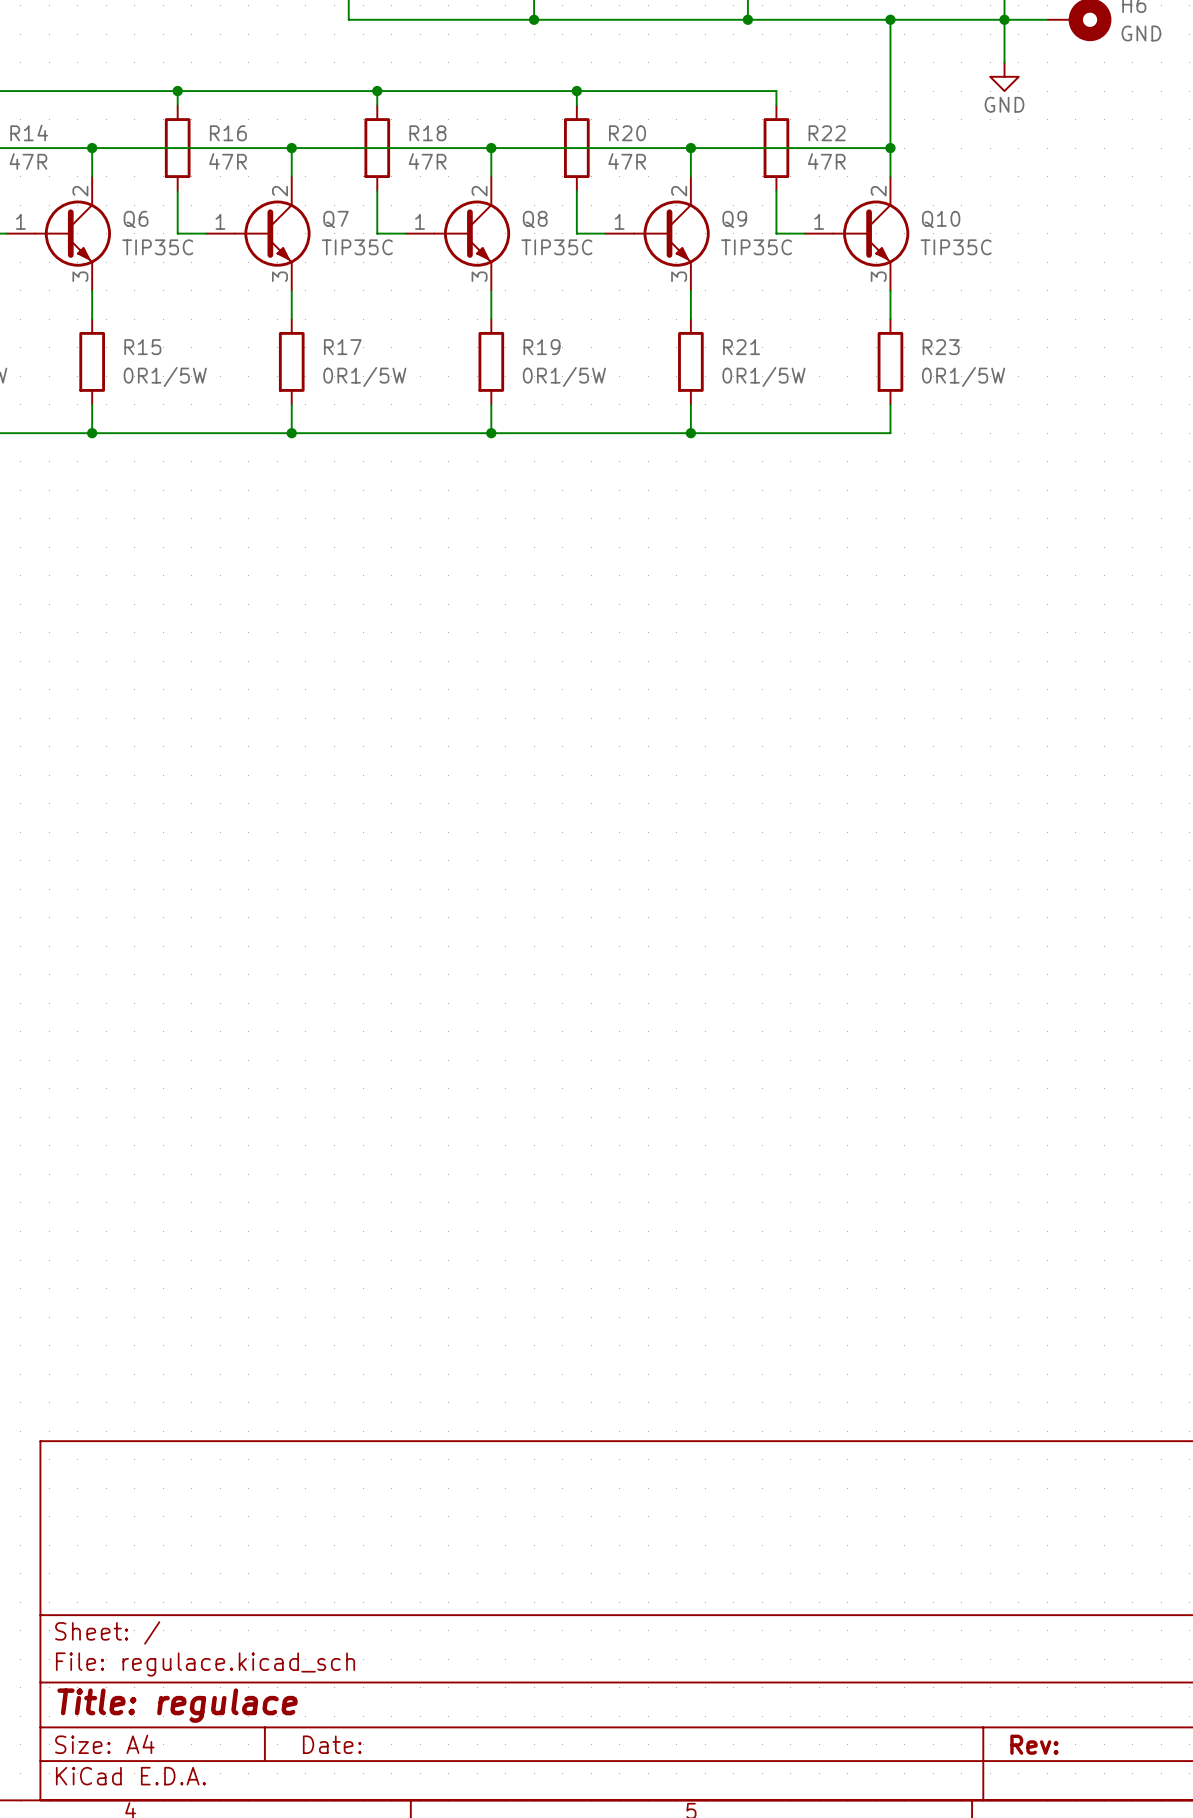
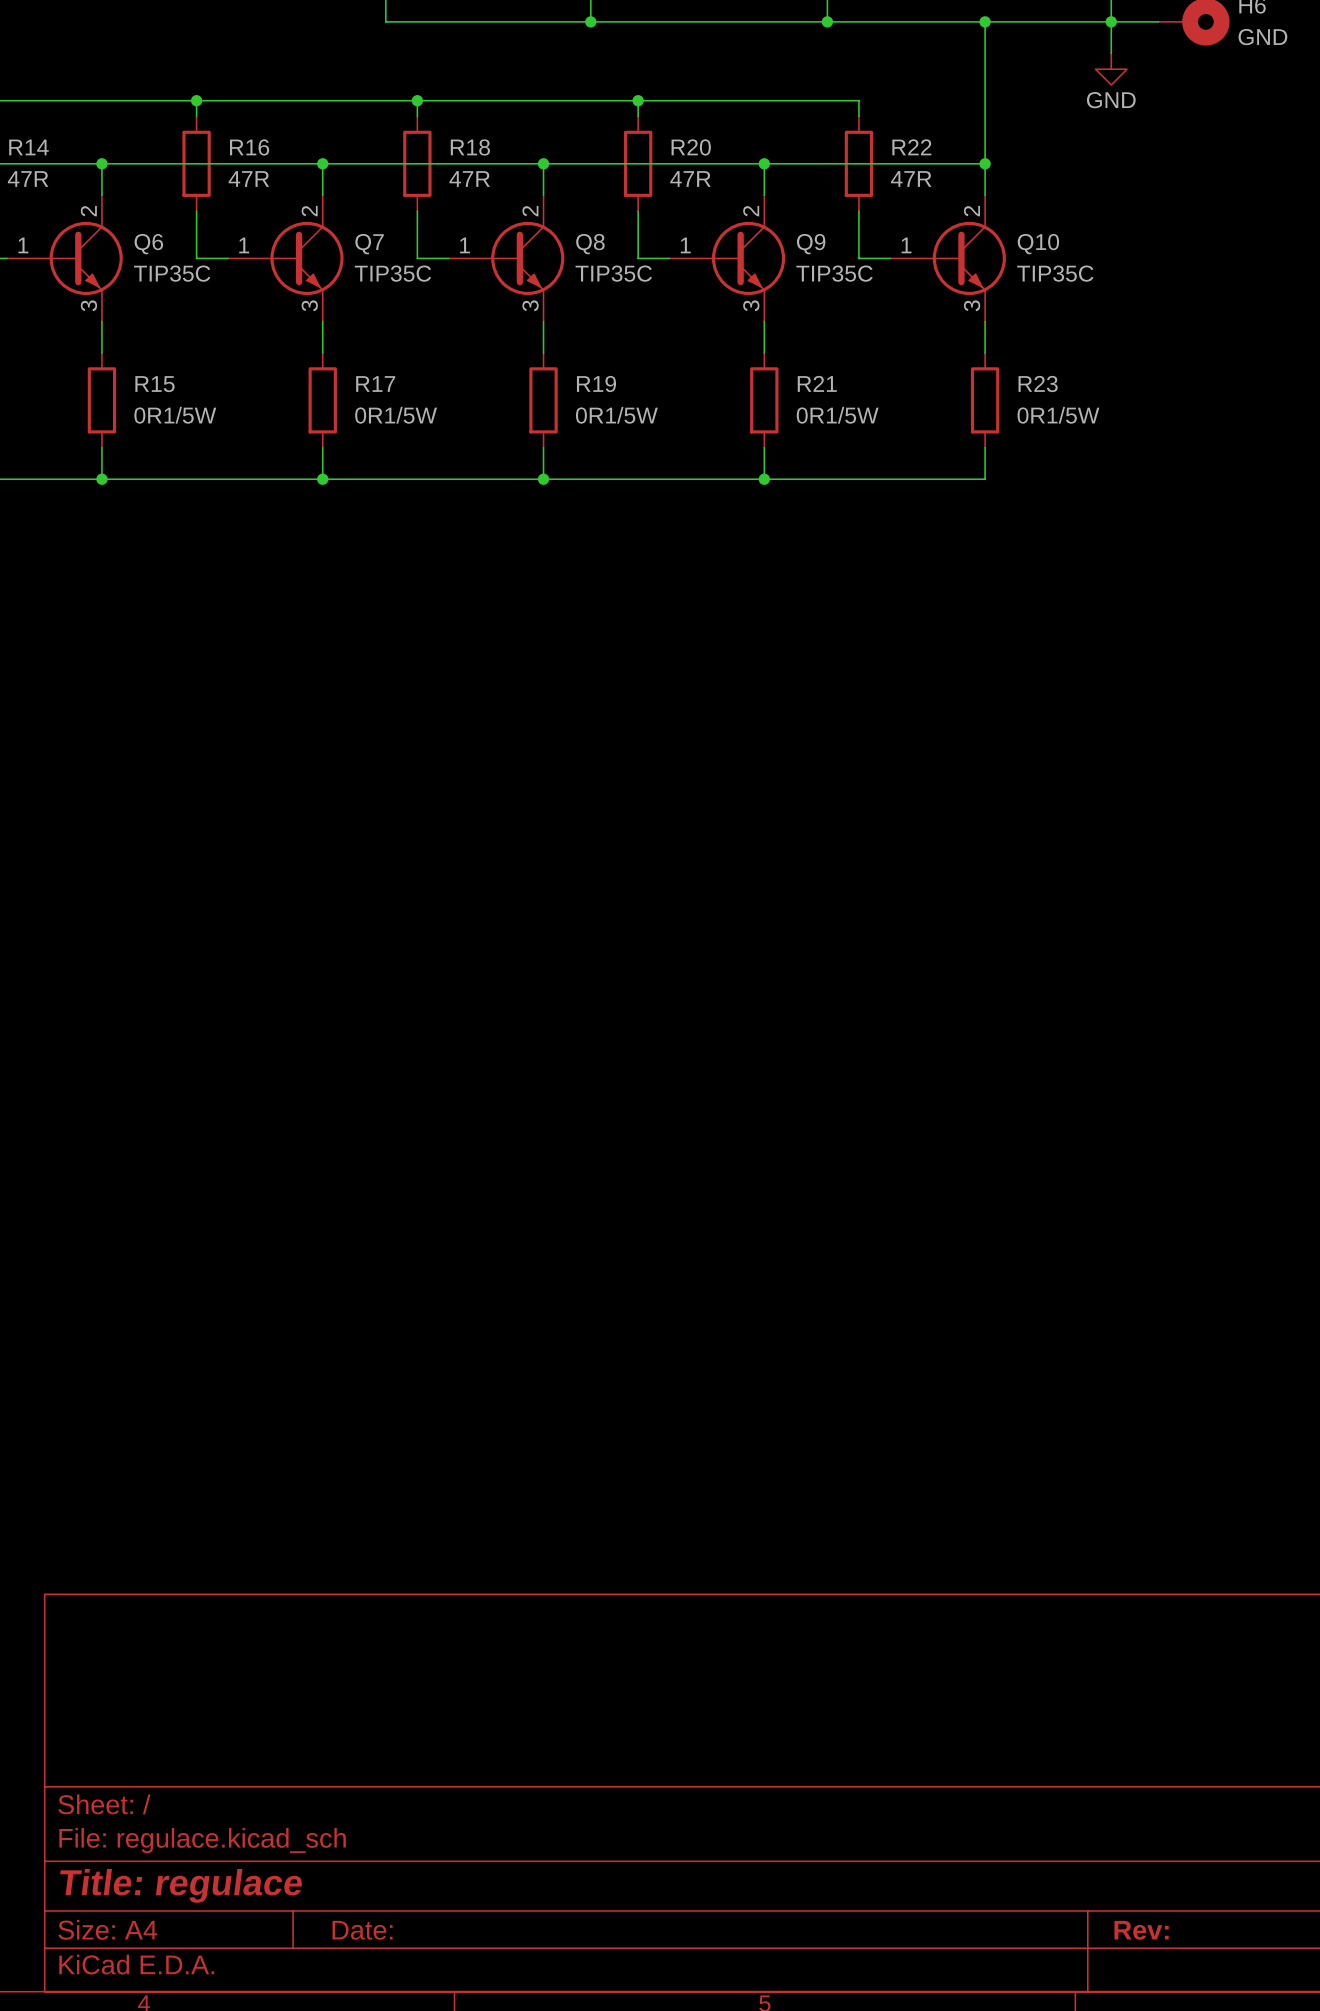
power symbol position: GND (1004, 76) -> GND (1111, 69)

